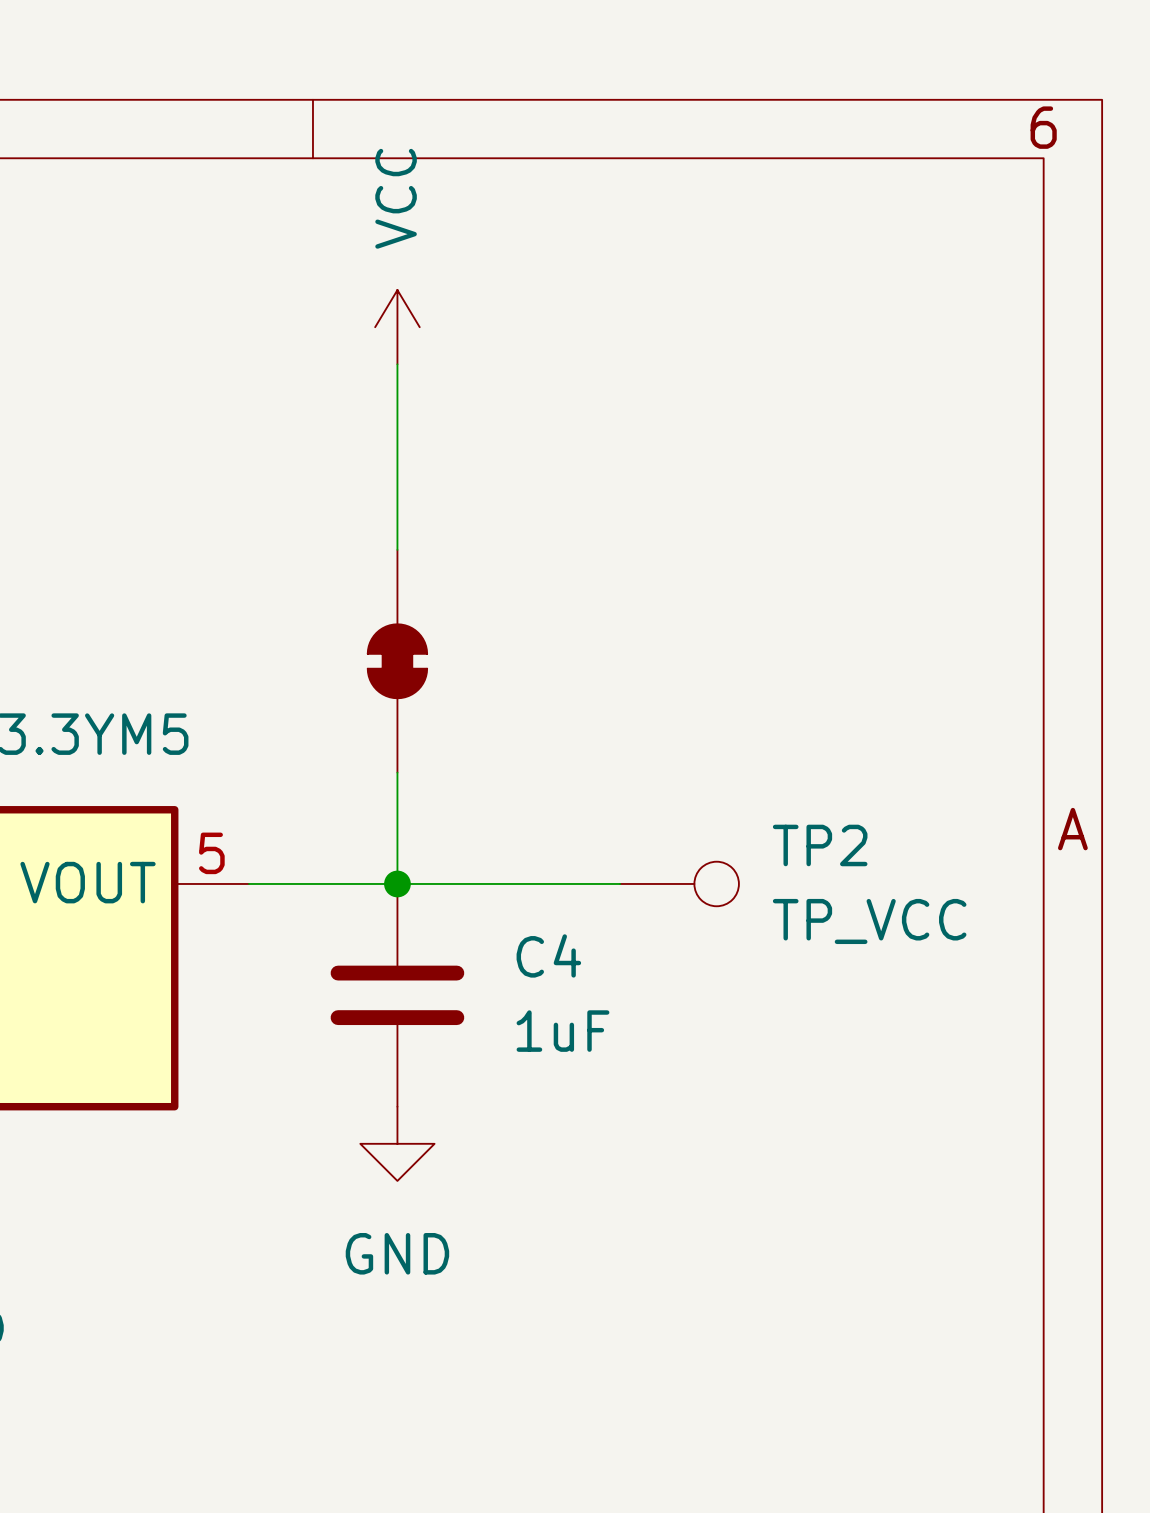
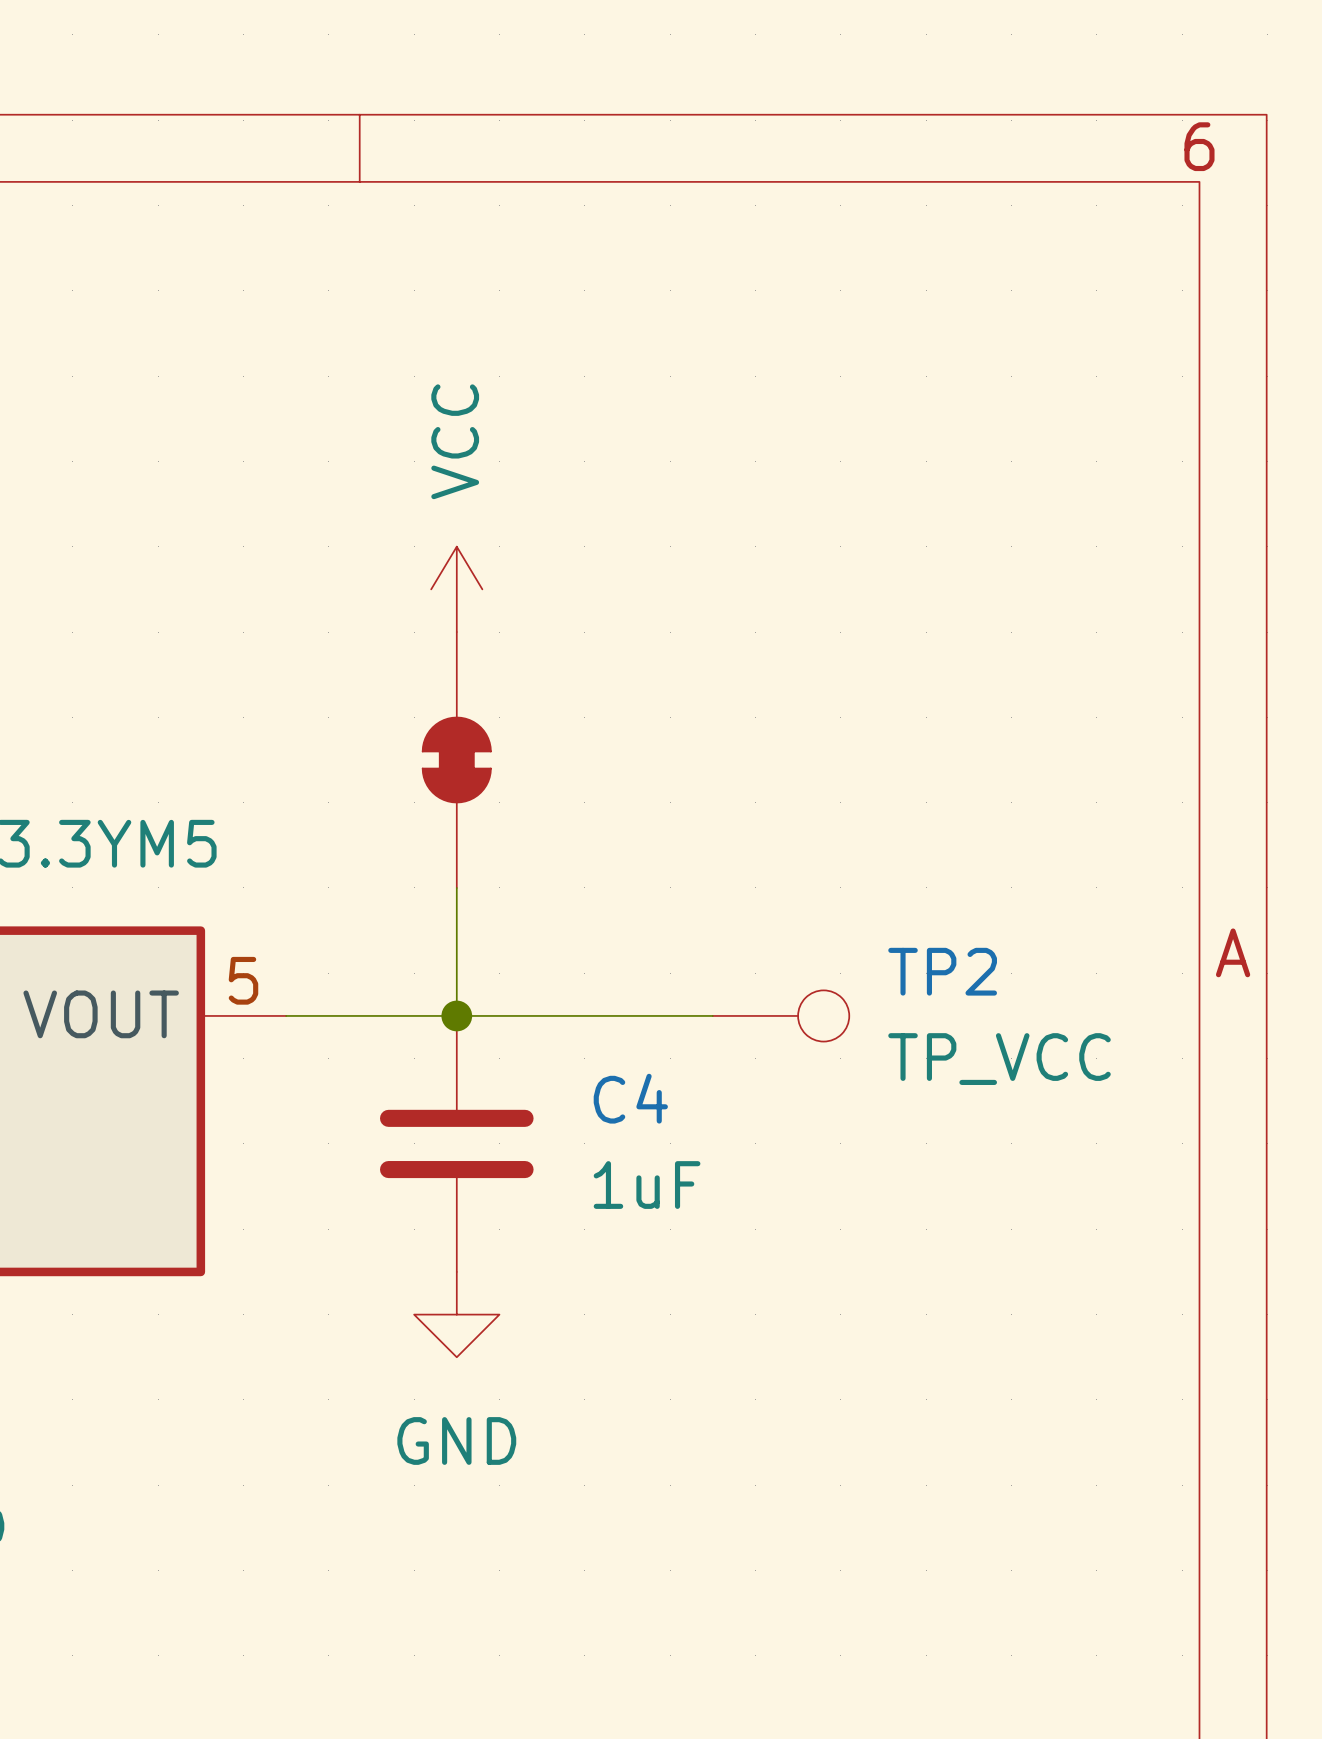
power symbol position: VCC (397, 327) -> VCC (456, 589)
wire: (397, 364) (397, 549) -> none

